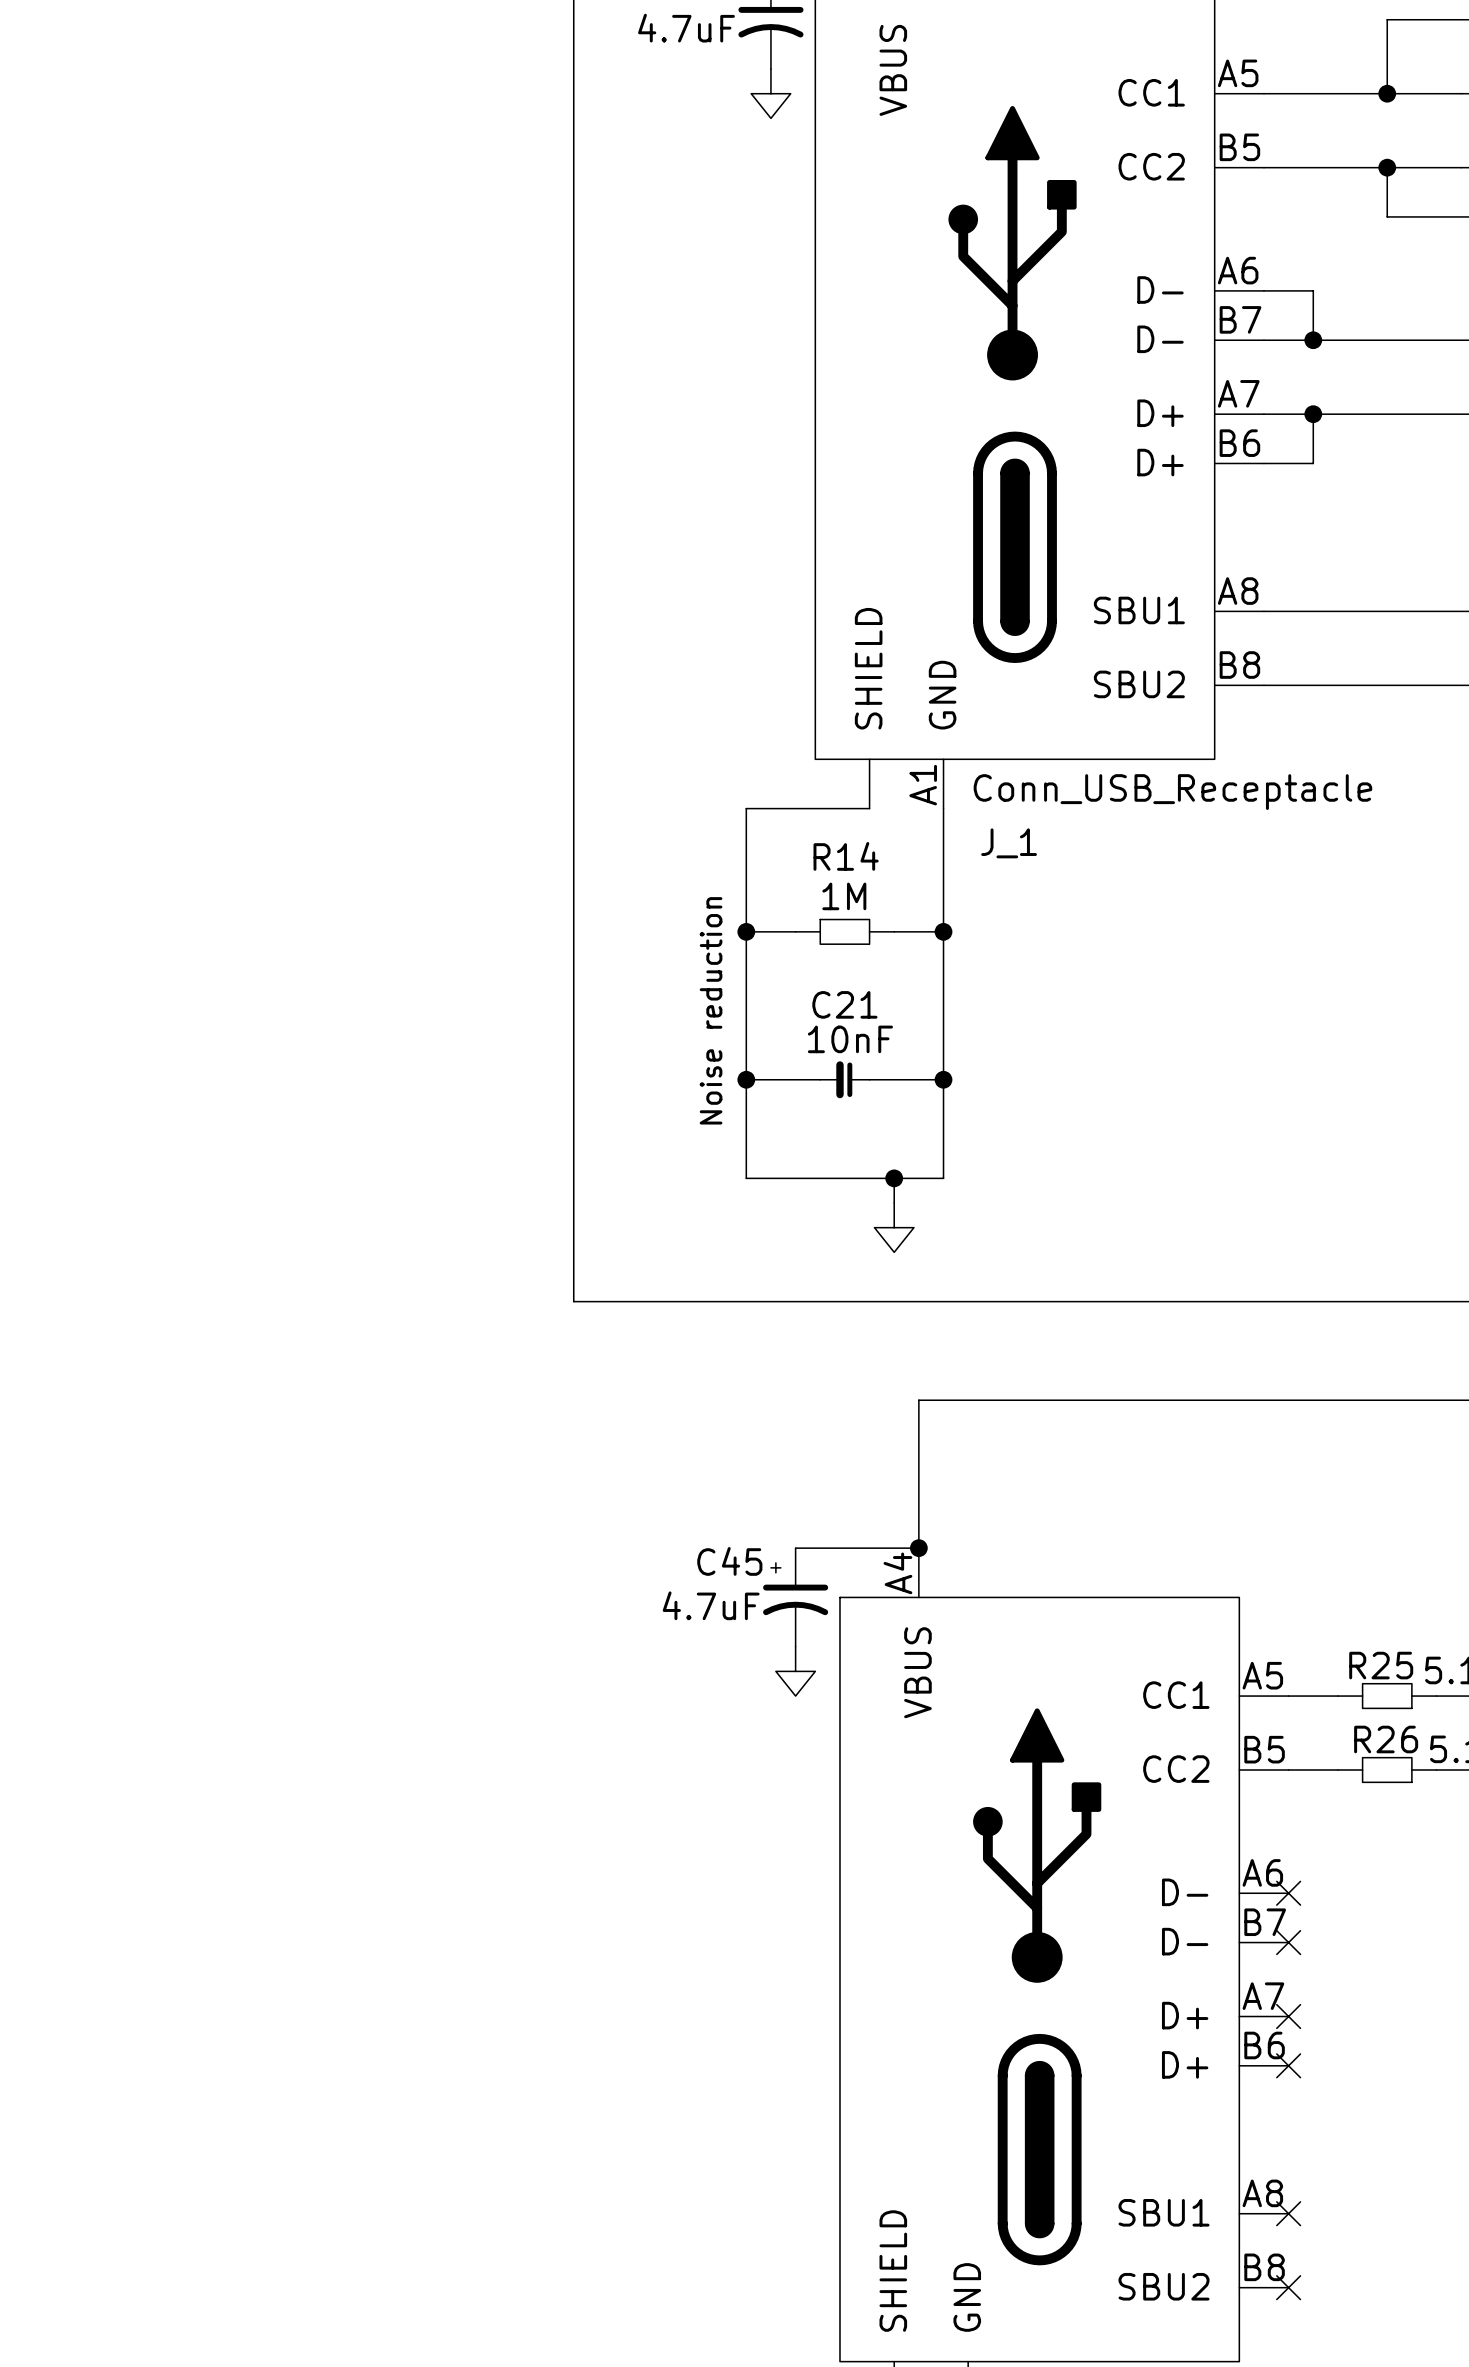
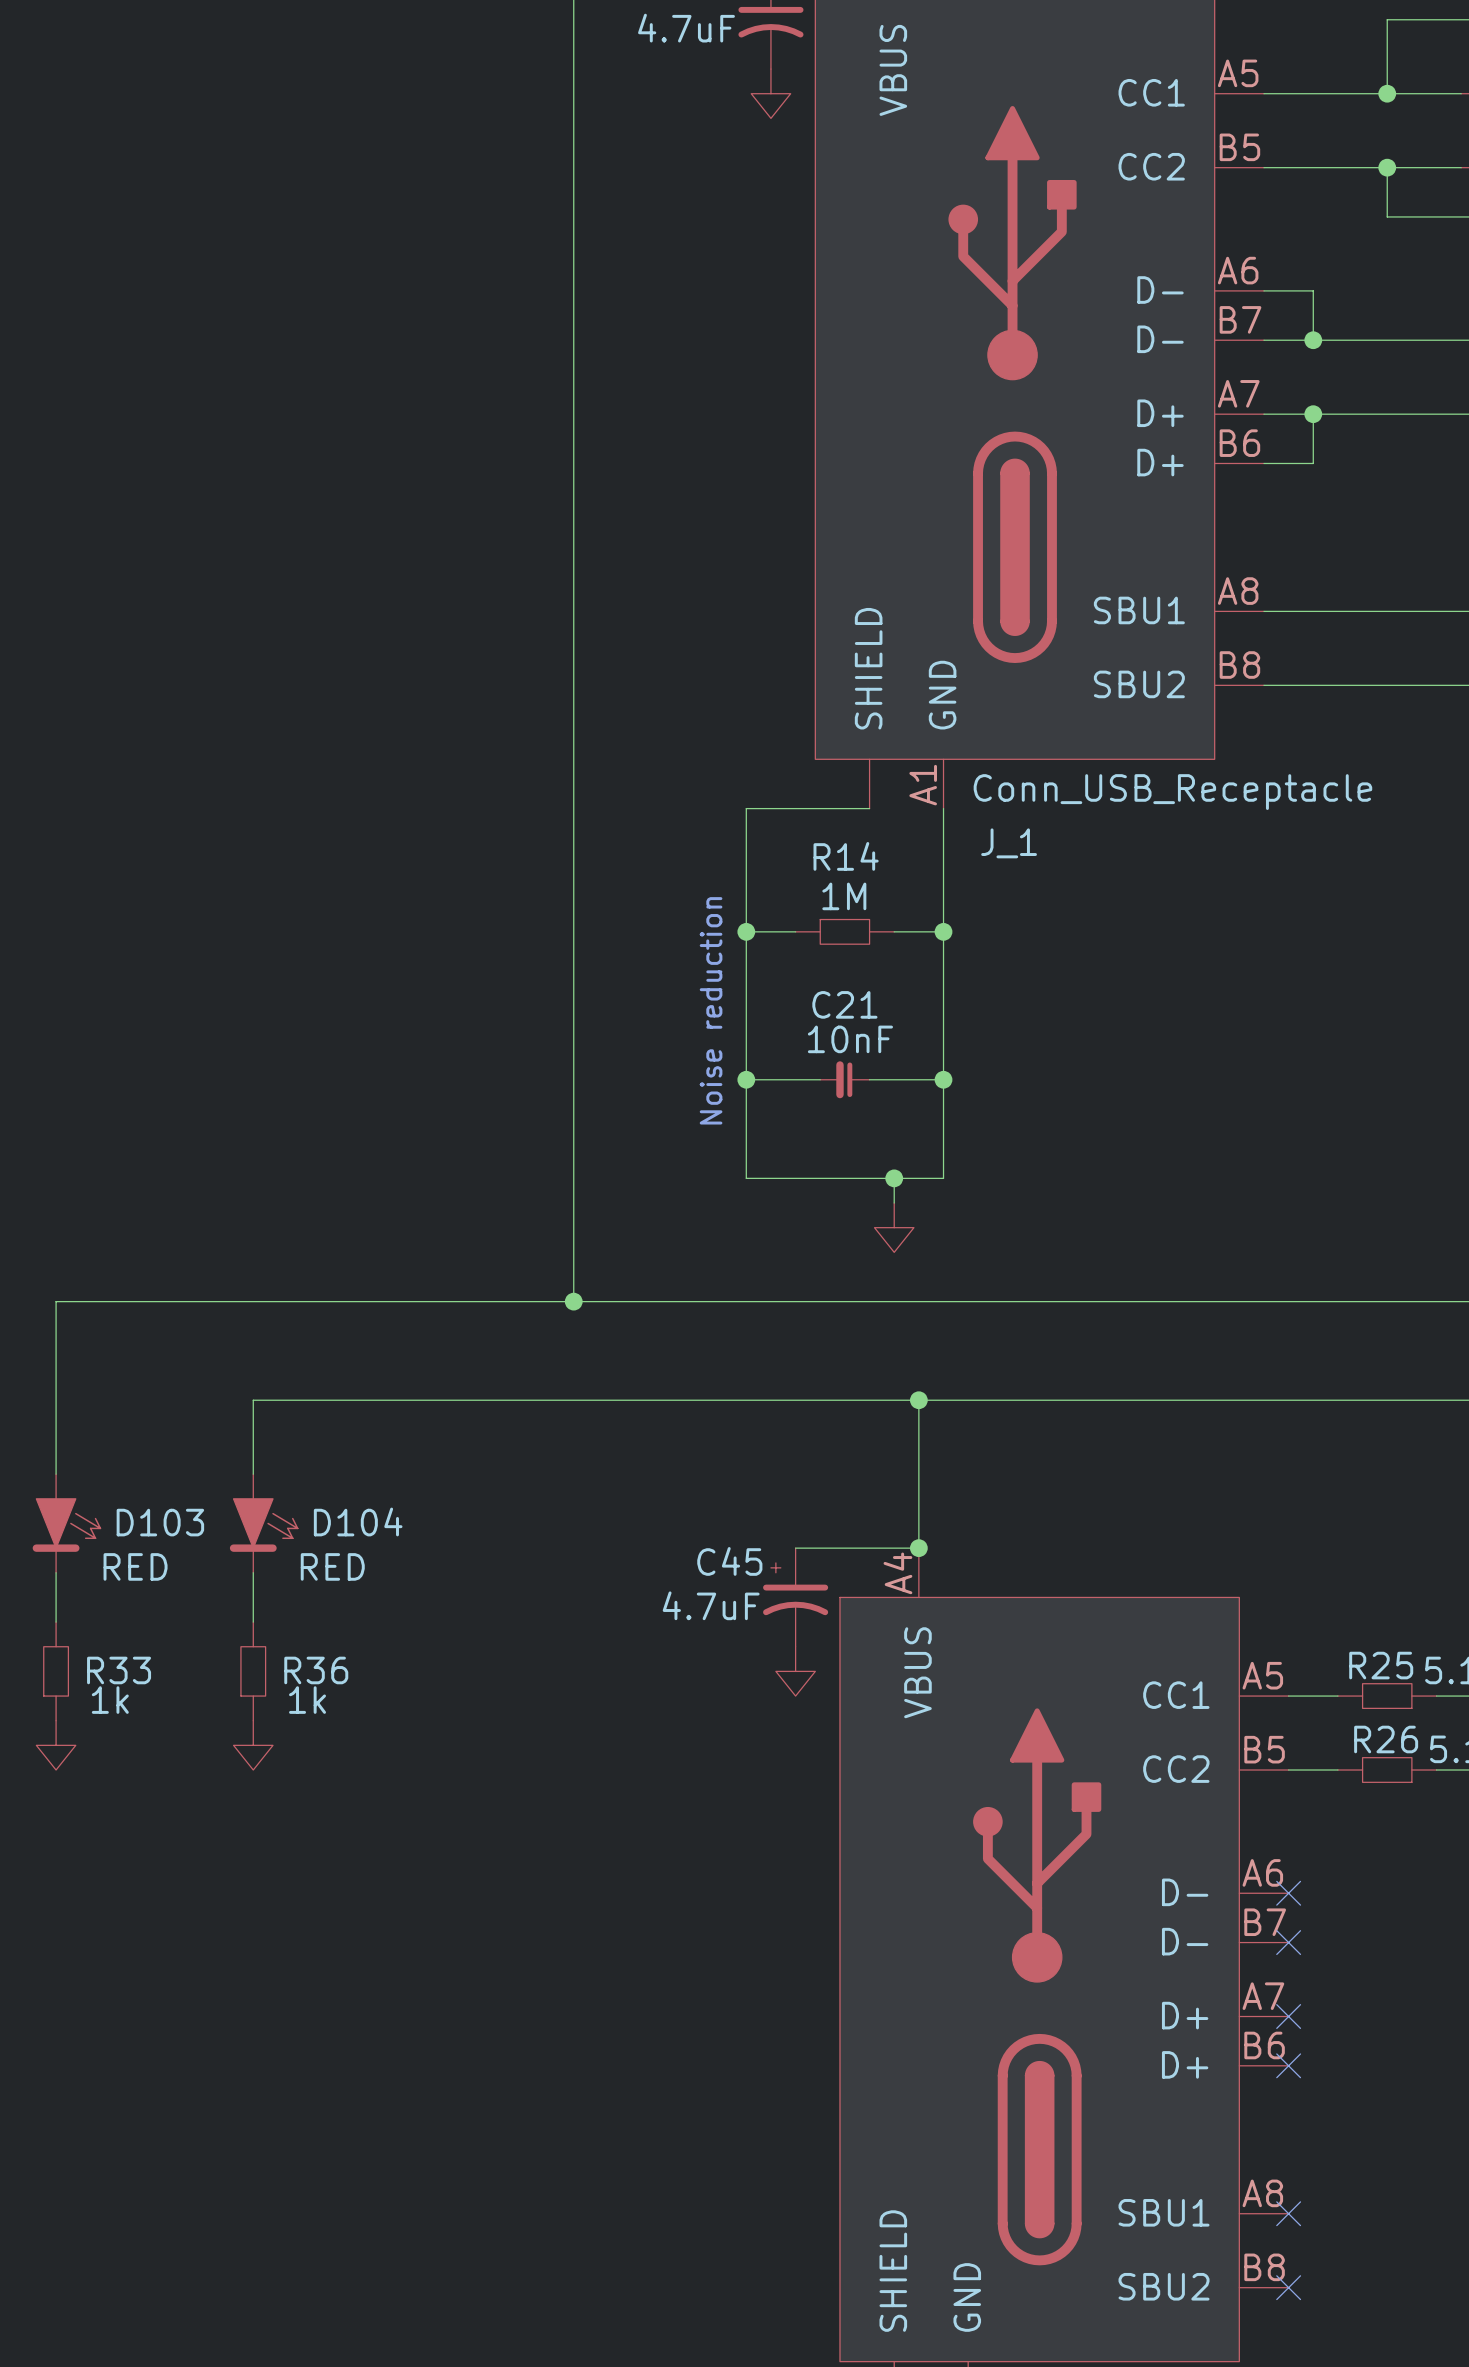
wire: none -> (573, 1301) (56, 1301) (56, 1474)
junction: none -> (573, 1301)
wire: none -> (918, 1400) (253, 1400) (253, 1474)
junction: none -> (918, 1400)
D103: none -> RED (66, 1523)
D104: none -> RED (264, 1523)
wire: none -> (56, 1572) (56, 1622)
wire: none -> (253, 1572) (253, 1622)
R33: none -> 1k (56, 1671)
R36: none -> 1k (253, 1671)
power symbol: none -> (56, 1745)
power symbol: none -> (253, 1745)

